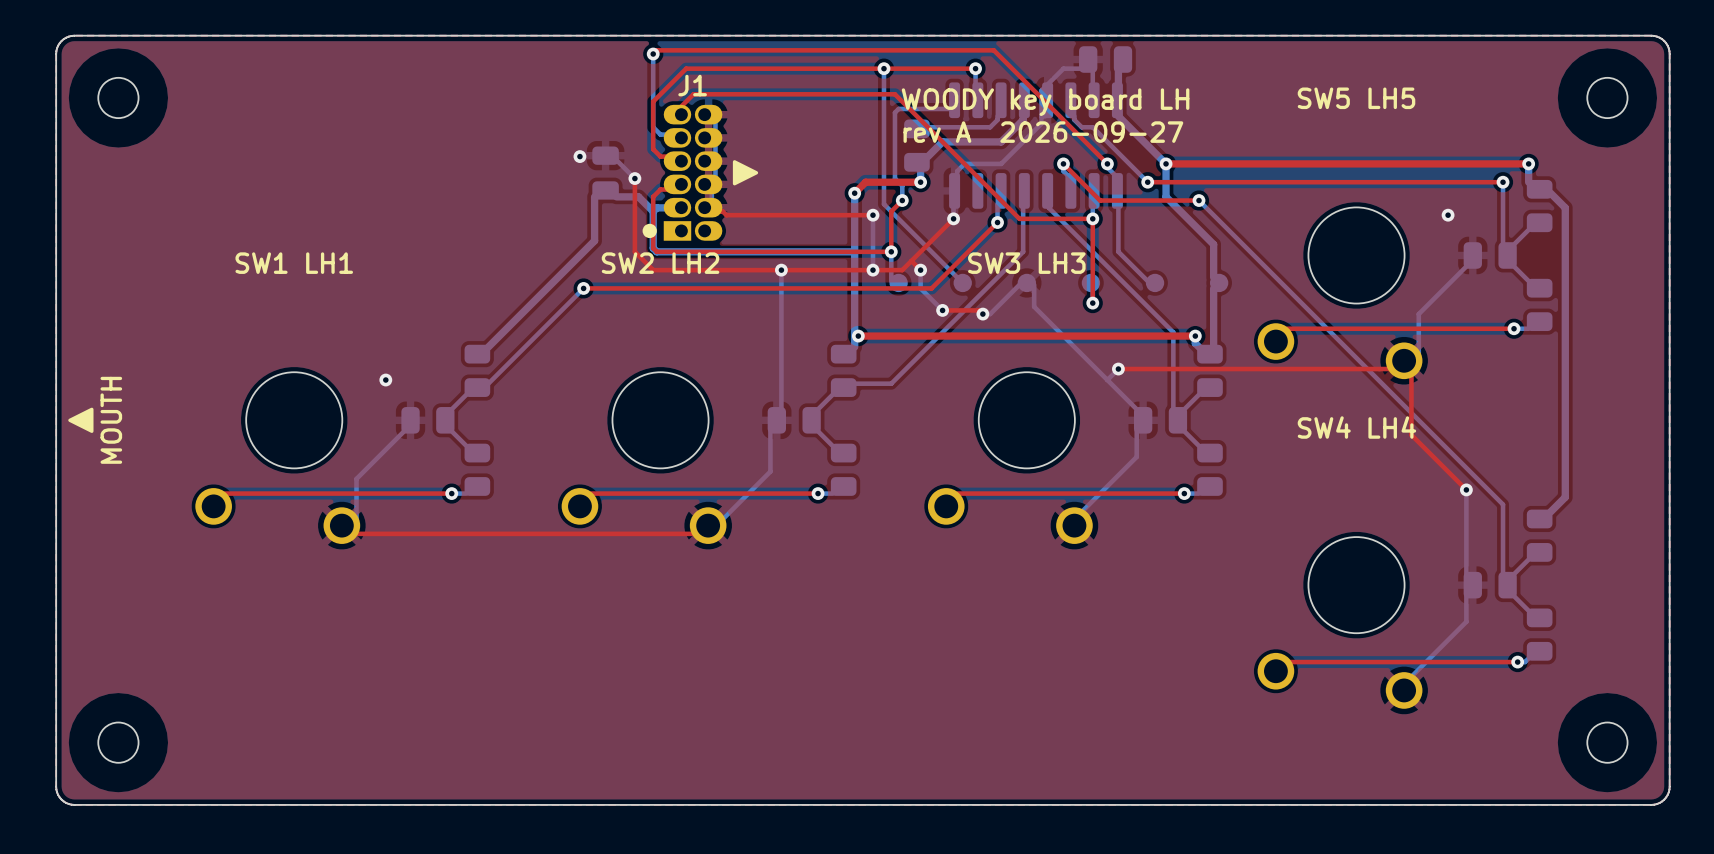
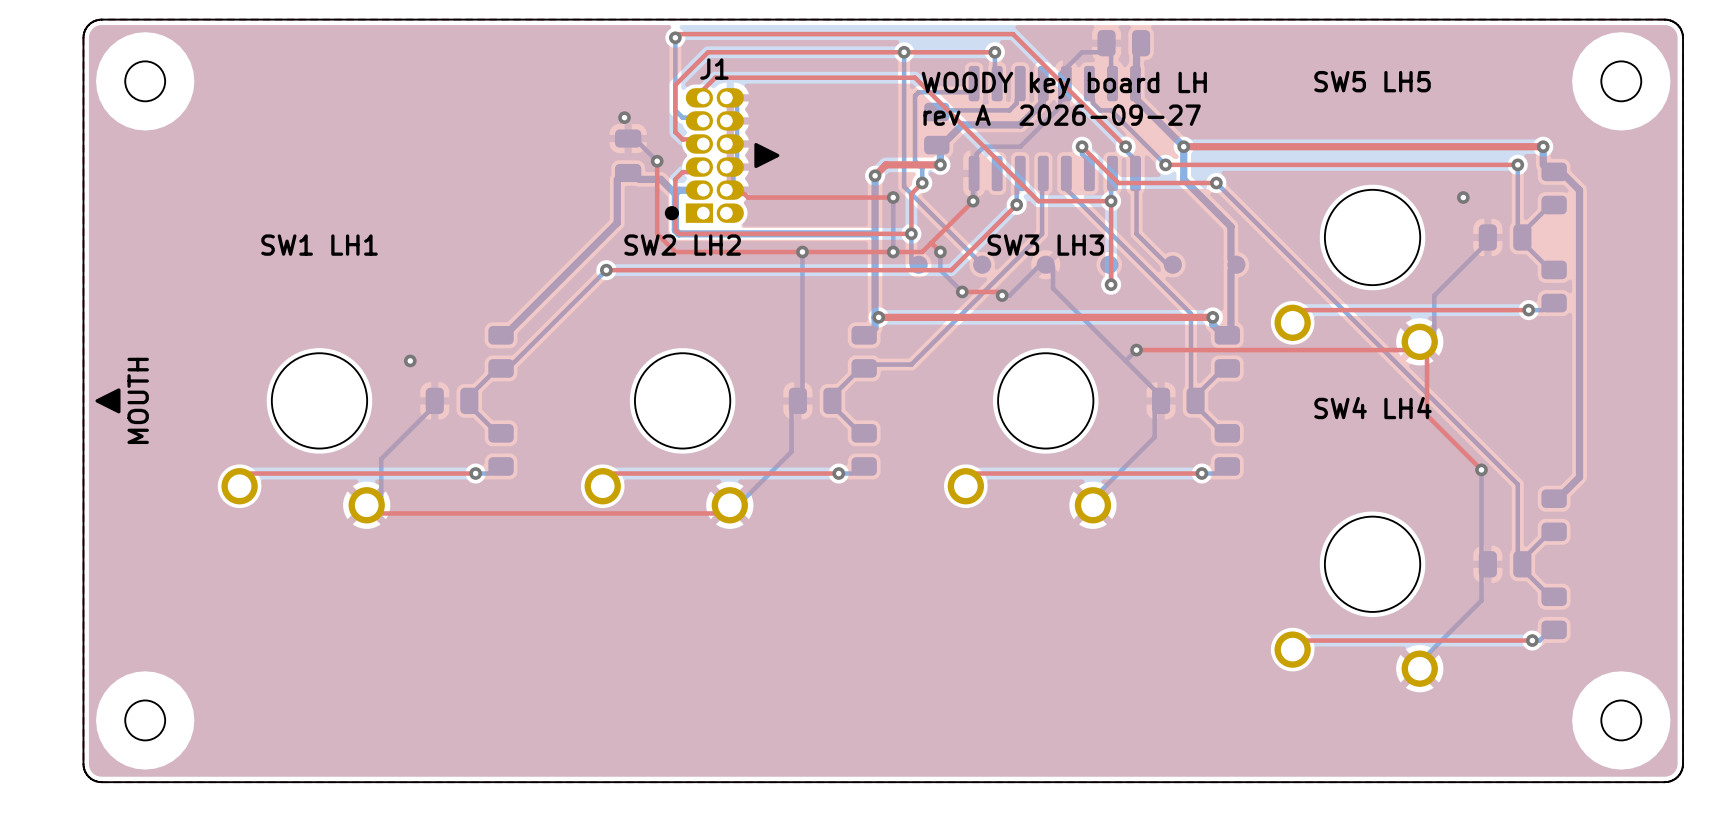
via position: (579, 156) -> (624, 117)

